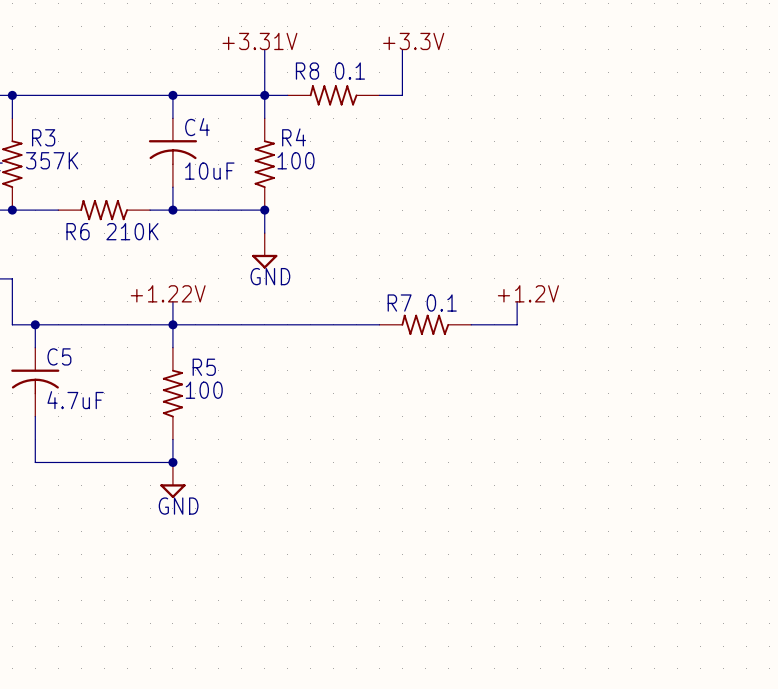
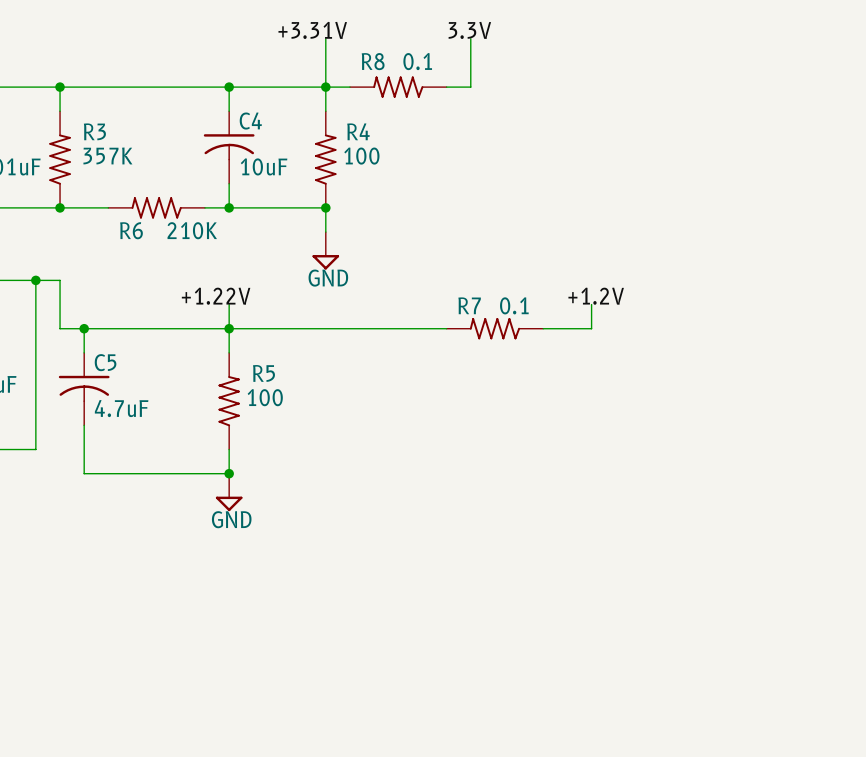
label: +3.3V (413, 41) -> 3.3V (469, 30)

